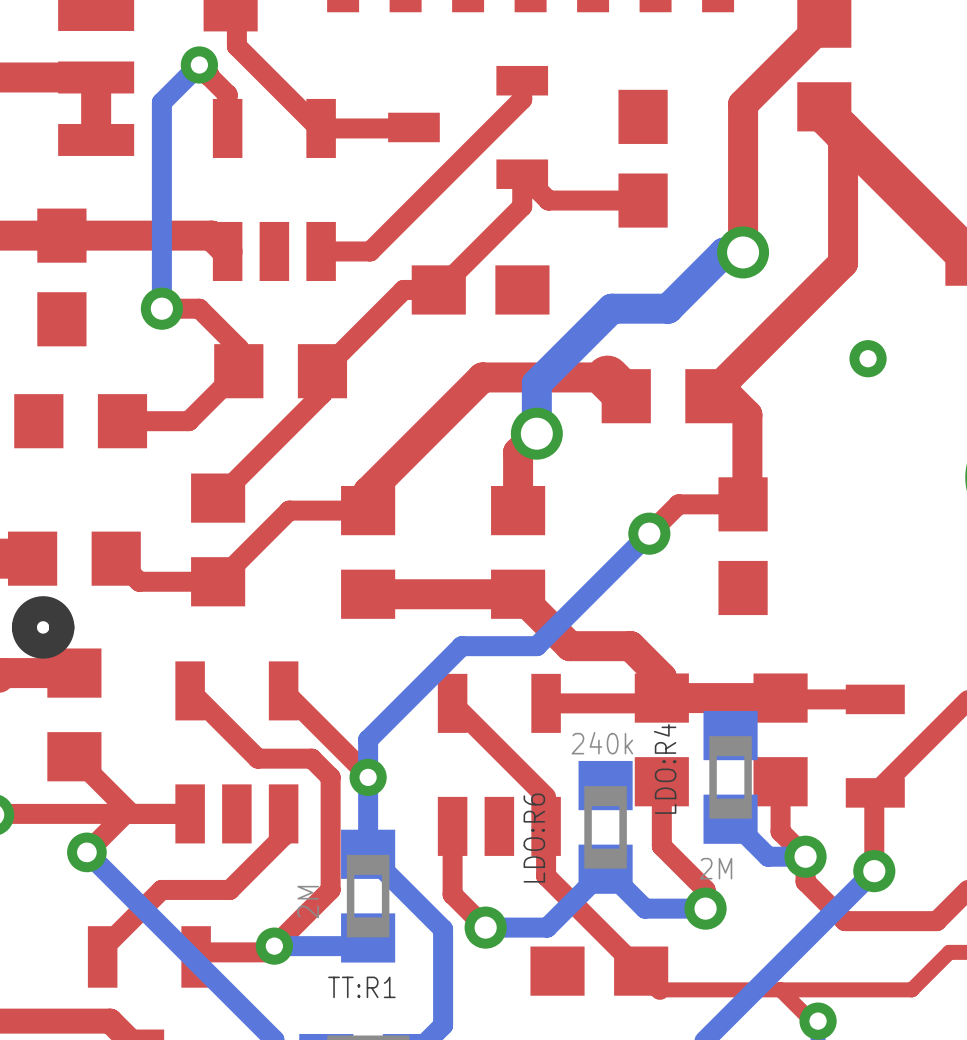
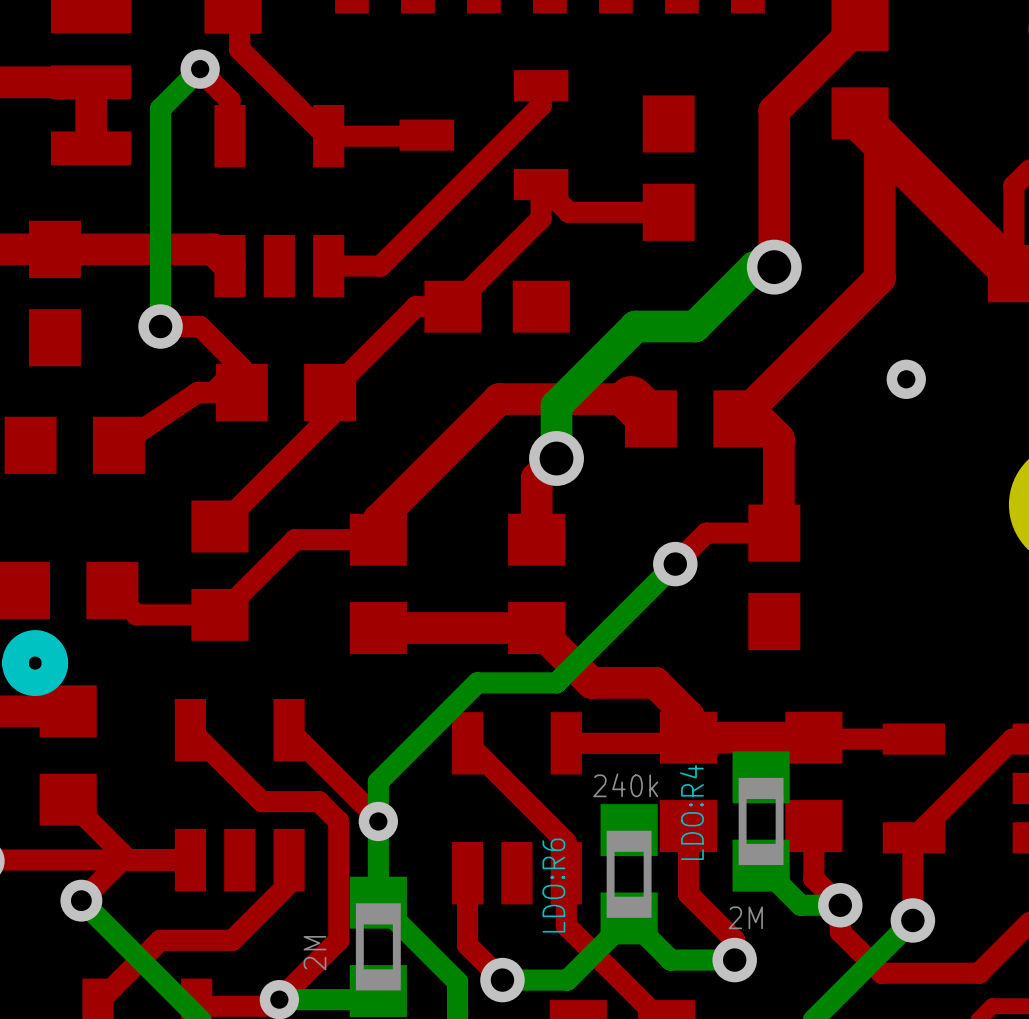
top track: (238, 371) (188, 421) (122, 421) -> (215, 385) (217, 388) (227, 378) (241, 392) (197, 392) (118, 445)

